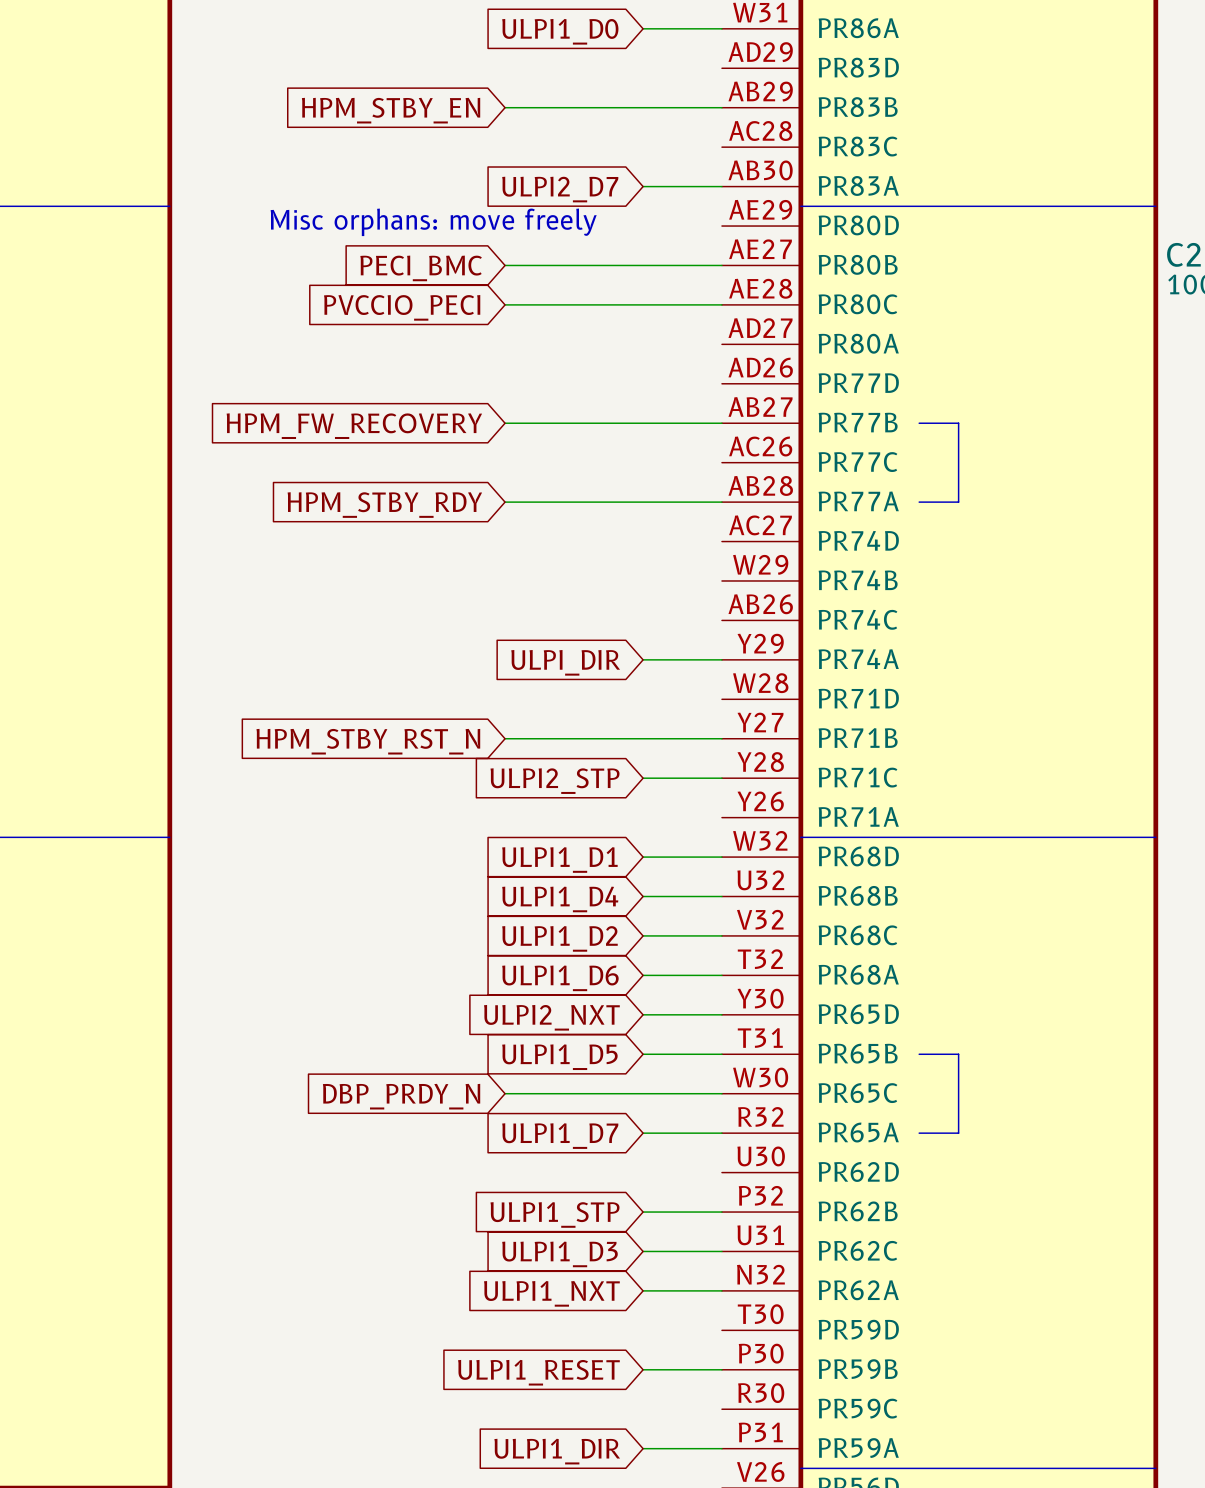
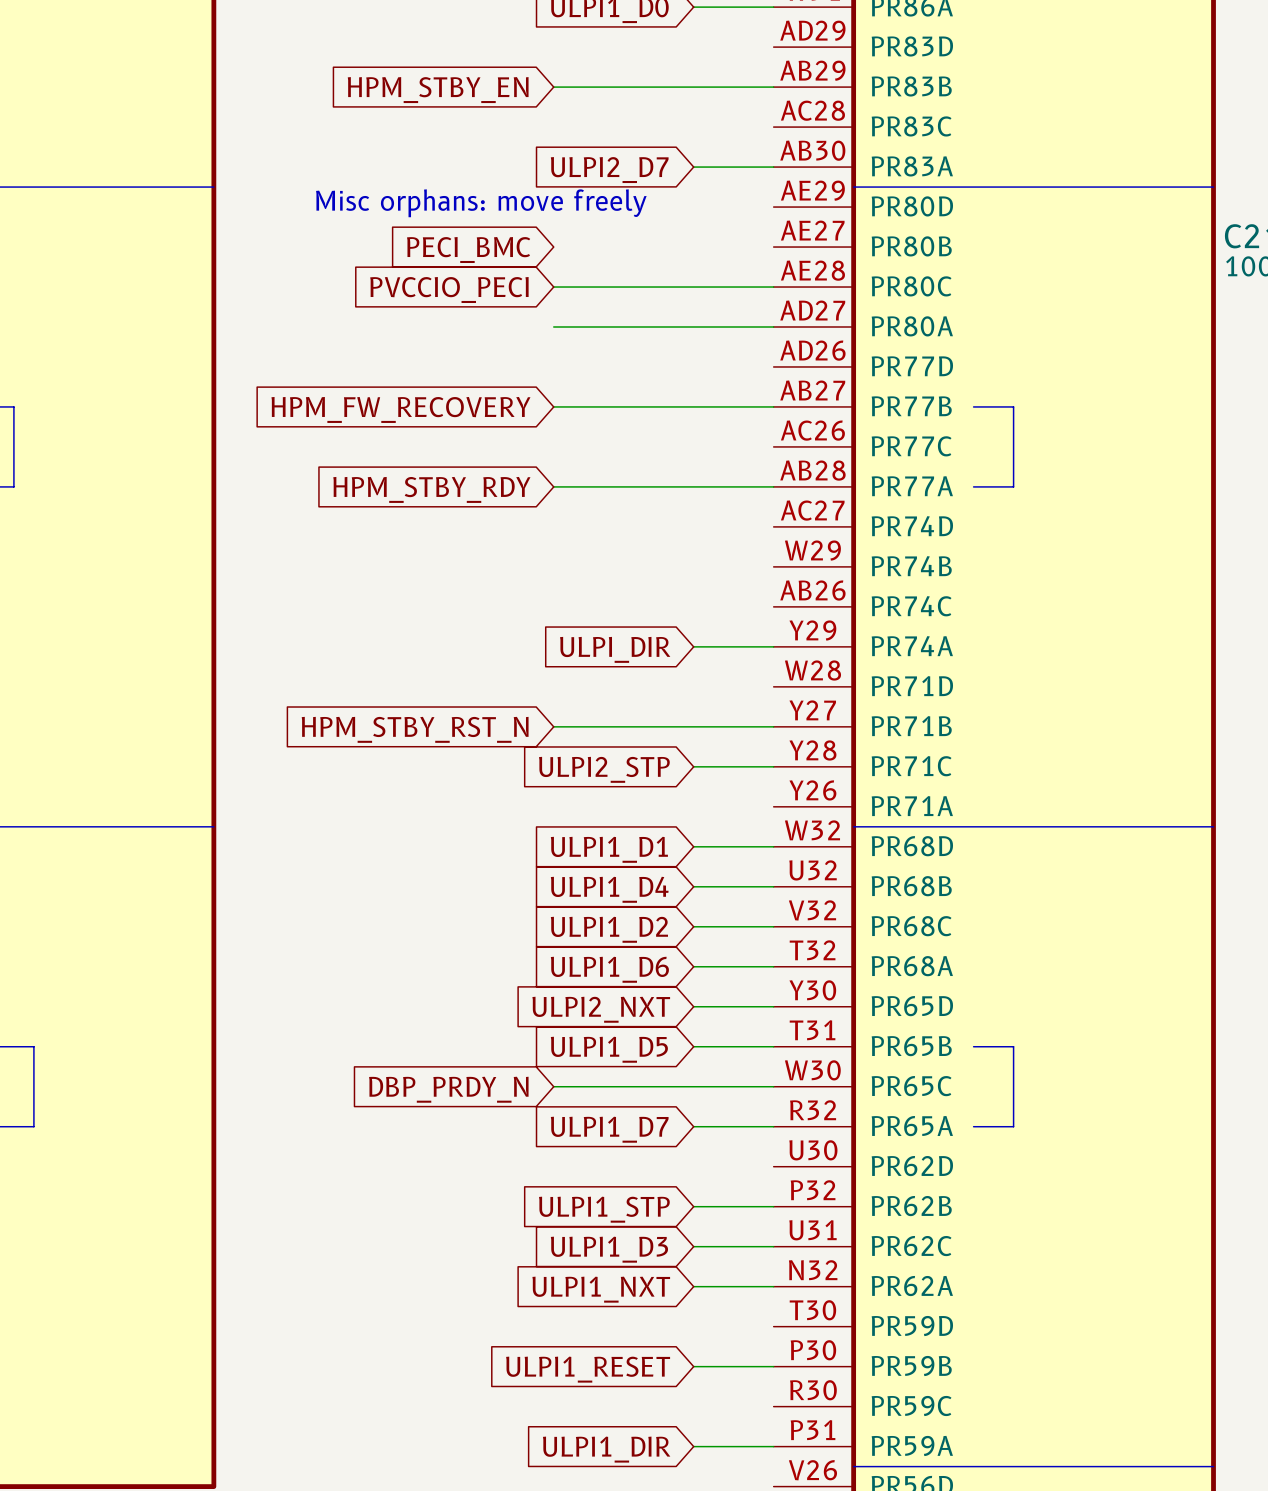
wire: (505, 265) (721, 265) -> (553, 326) (773, 326)

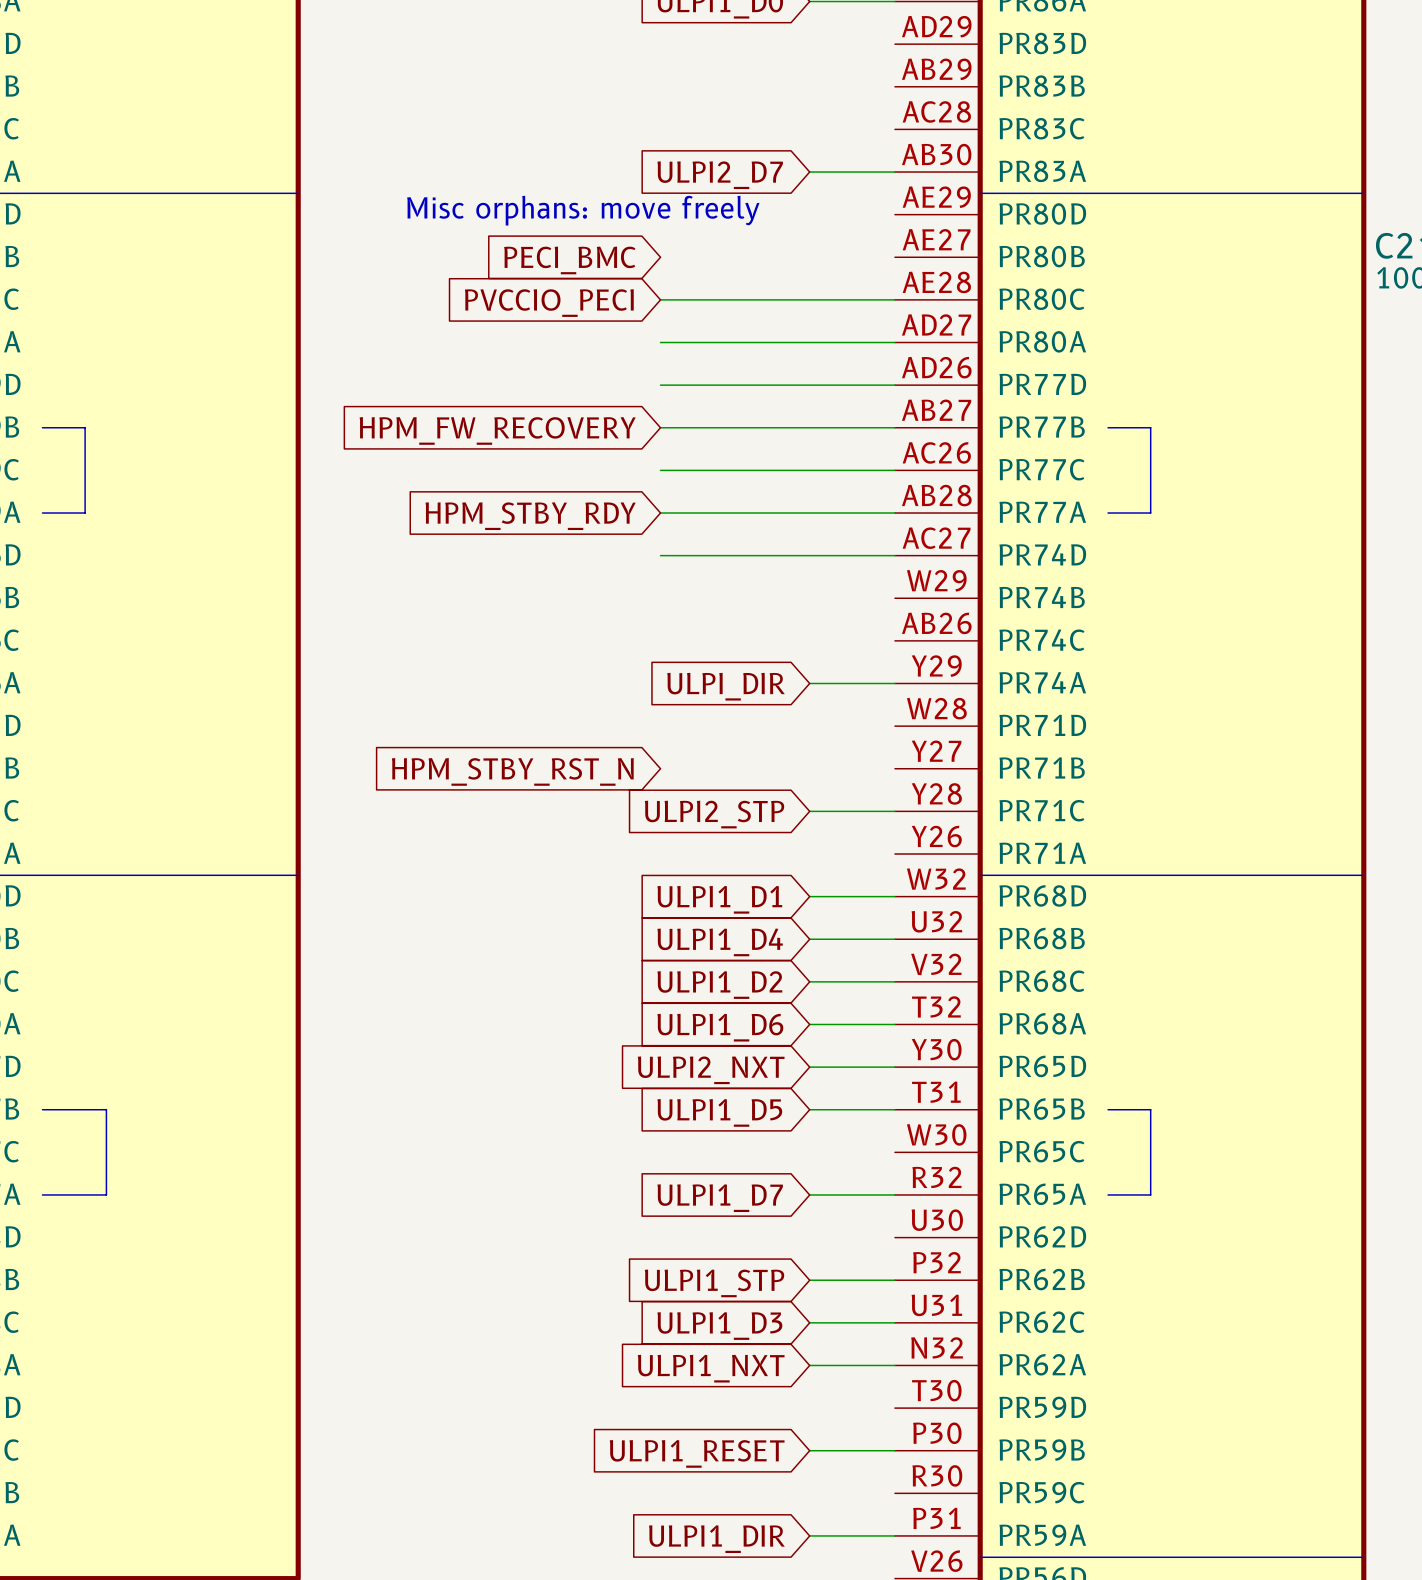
wire: (553, 87) (773, 87) -> (660, 385) (894, 385)
global label: HPM_STBY_EN (438, 90) -> none
wire: none -> (660, 470) (894, 470)
wire: (553, 726) (773, 726) -> (660, 555) (894, 555)
wire: (553, 1086) (773, 1086) -> none
global label: DBP_PRDY_N (448, 1089) -> none

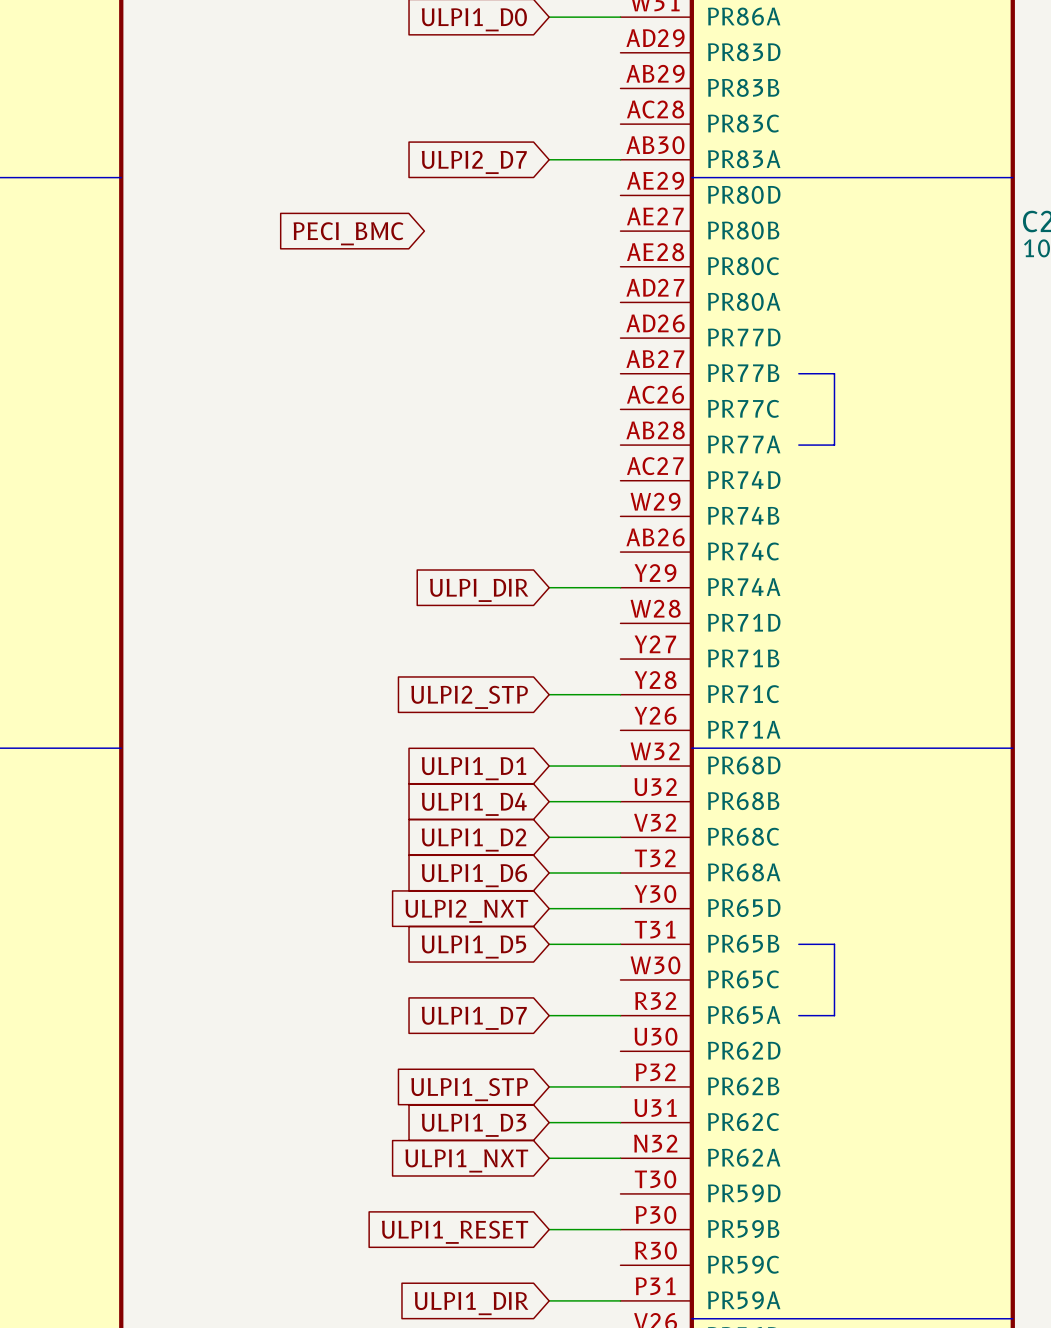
text: Misc orphans: move freely (583, 210) -> none
wire: (660, 299) (894, 299) -> none
global label: PVCCIO_PECI (549, 303) -> none
wire: (660, 342) (894, 342) -> none
wire: (660, 385) (894, 385) -> none
wire: (660, 427) (894, 427) -> none
global label: HPM_FW_RECOVERY (497, 430) -> none
wire: (660, 470) (894, 470) -> none
wire: (660, 513) (894, 513) -> none
global label: HPM_STBY_RDY (530, 516) -> none
wire: (660, 555) (894, 555) -> none
global label: HPM_STBY_RST_N (512, 771) -> none

